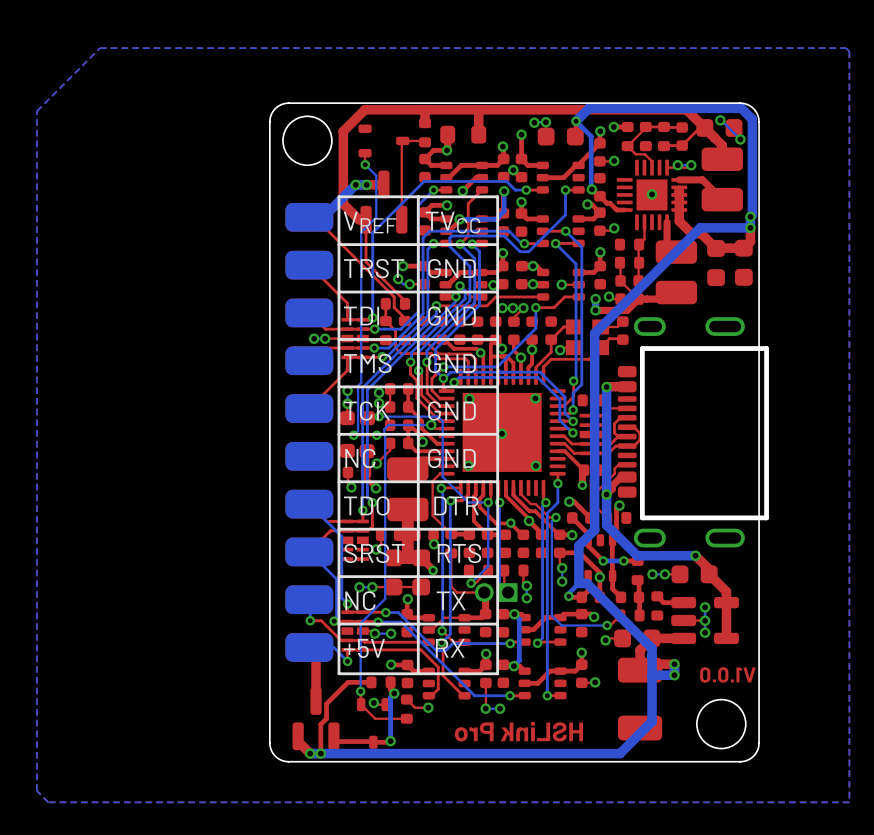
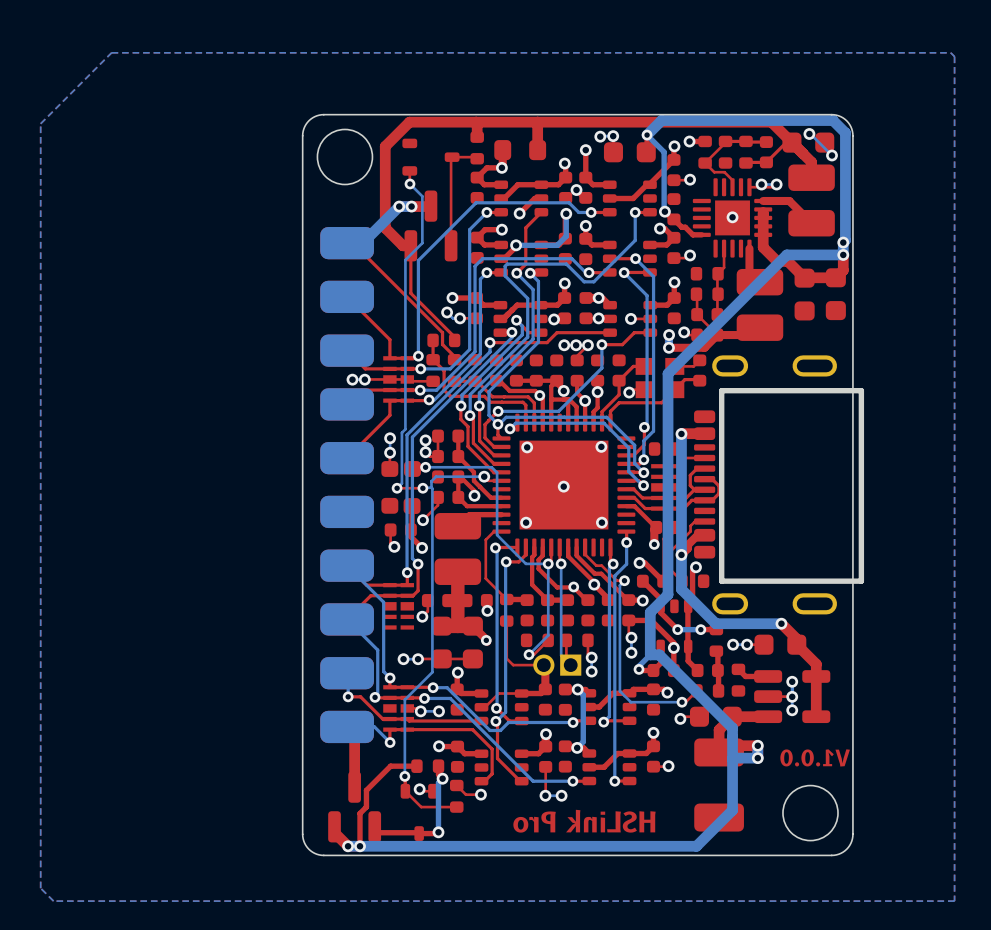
line: (418, 196) (418, 673) -> none
line: (497, 196) (497, 673) (338, 673) (338, 196) (497, 196) -> none
text: VREF (370, 222) -> none
text: TVCC (452, 222) -> none
line: (497, 244) (338, 244) -> none
text: TRST (374, 268) -> none
text: GND (452, 268) -> none
line: (497, 292) (338, 292) -> none
text: TDI (361, 316) -> none
text: GND (452, 316) -> none
line: (497, 339) (338, 339) -> none
text: TMS (367, 363) -> none
text: GND (452, 363) -> none
line: (497, 386) (338, 386) -> none
text: GND (452, 410) -> none
text: TCK (367, 411) -> none
line: (497, 434) (338, 434) -> none
text: NC (360, 458) -> none
text: GND (452, 458) -> none
line: (497, 481) (338, 481) -> none
text: TDO (366, 505) -> none
text: DTR (456, 505) -> none
line: (497, 529) (338, 529) -> none
text: SRST (374, 553) -> none
text: RTS (459, 553) -> none
line: (497, 576) (338, 576) -> none
text: NC (360, 600) -> none
text: TX (451, 600) -> none
line: (497, 624) (338, 624) -> none
text: +5V (364, 648) -> none
text: RX (450, 648) -> none

